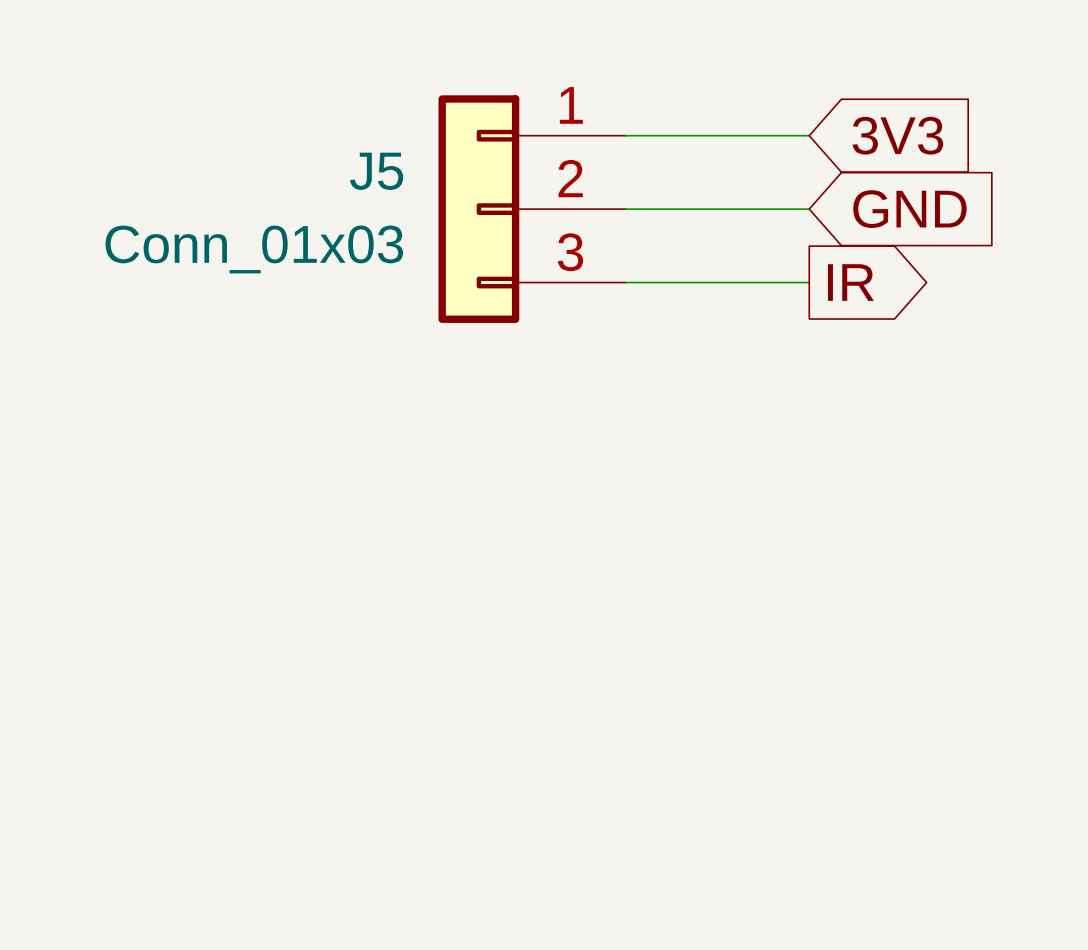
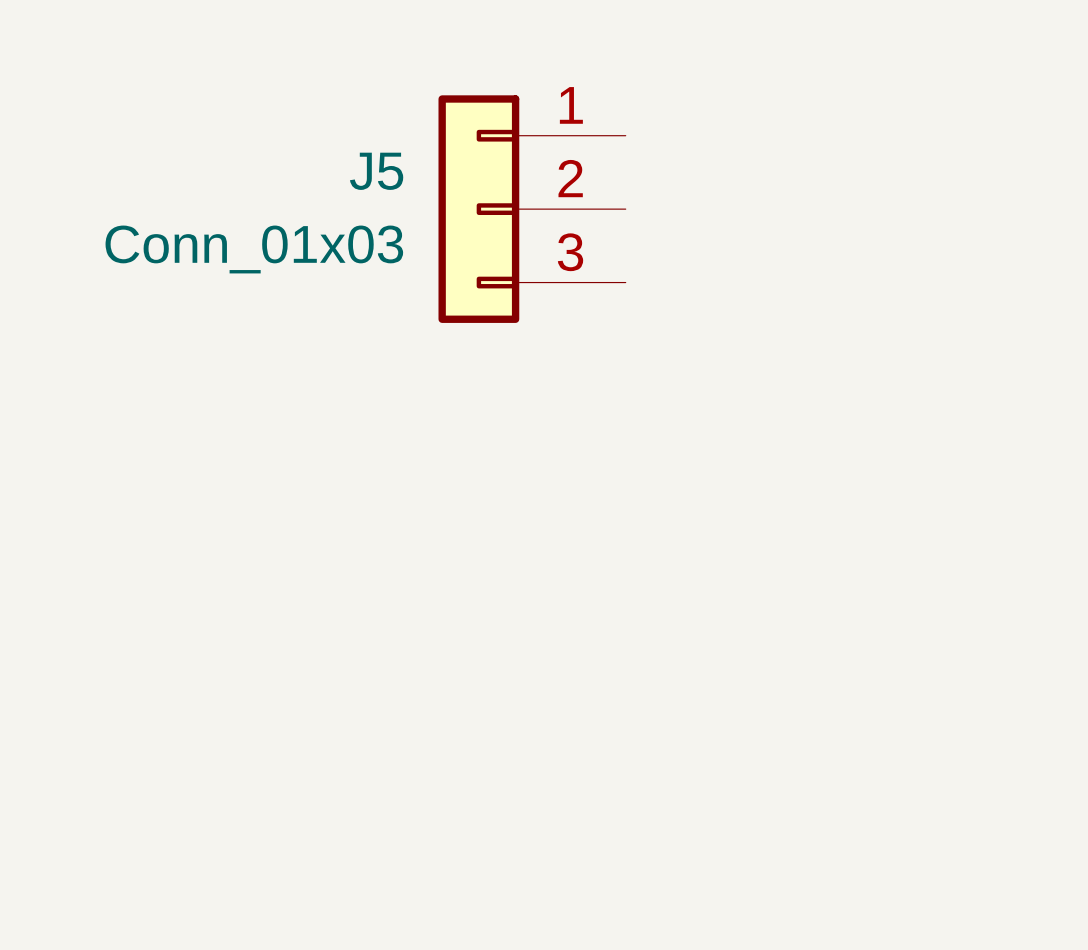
wire: (625, 135) (809, 135) -> none
global label: 3V3 (897, 135) -> none
wire: (625, 209) (809, 209) -> none
global label: GND (909, 209) -> none
wire: (625, 282) (809, 282) -> none
global label: IR (850, 282) -> none

